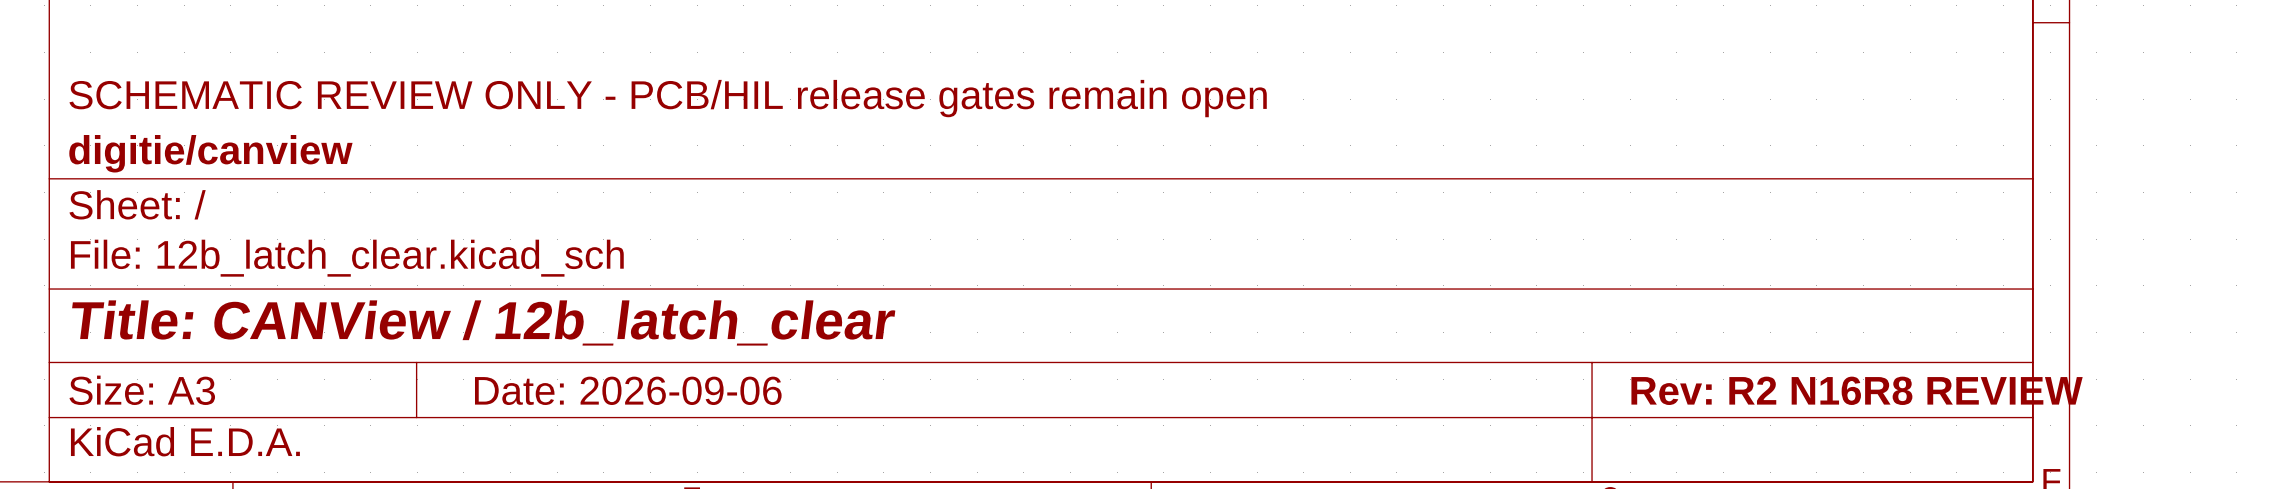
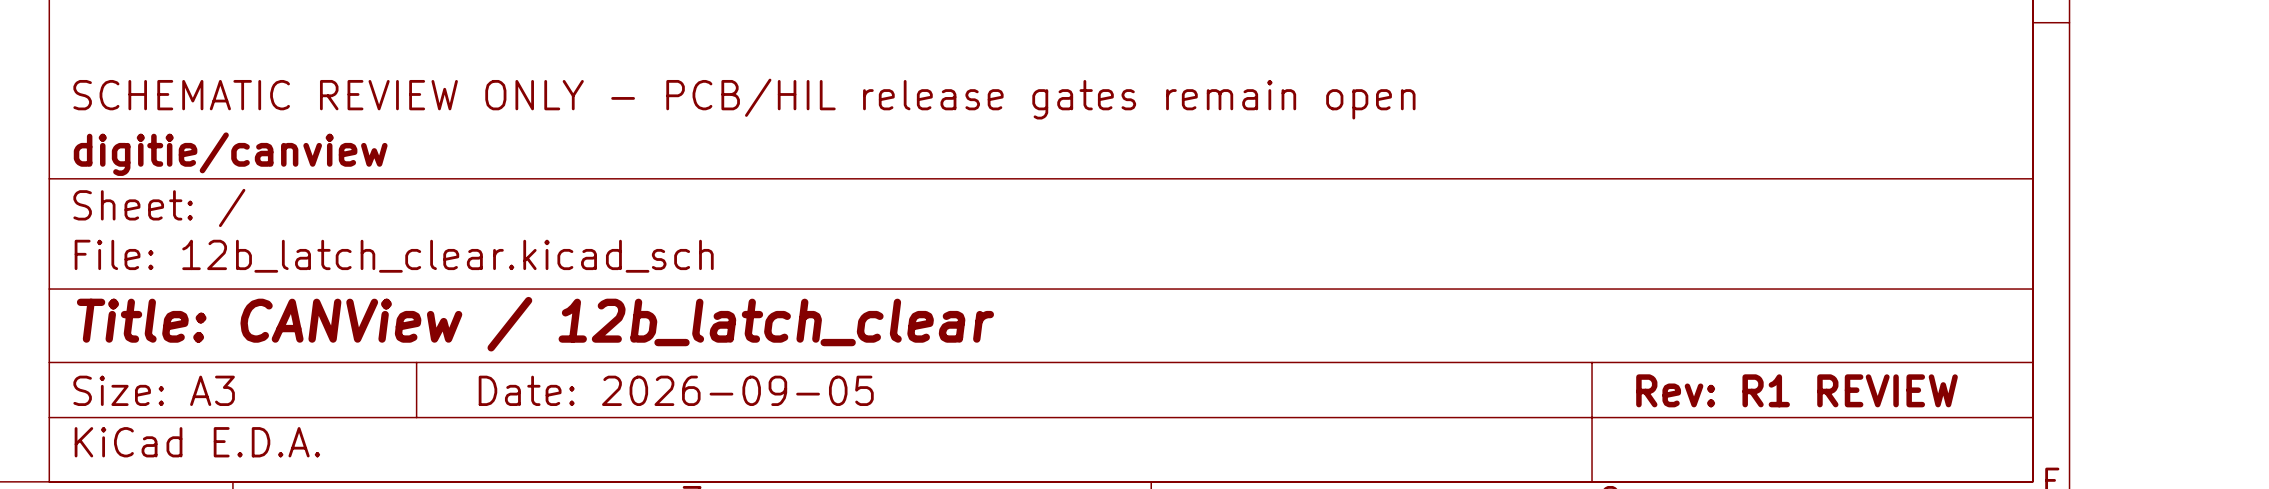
title block: Date: 2026-09-06 (628, 390) -> Date: 2026-09-05 (676, 390)
title block: Rev: R2 N16R8 REVIEW (1857, 390) -> Rev: R1 REVIEW (1797, 390)

